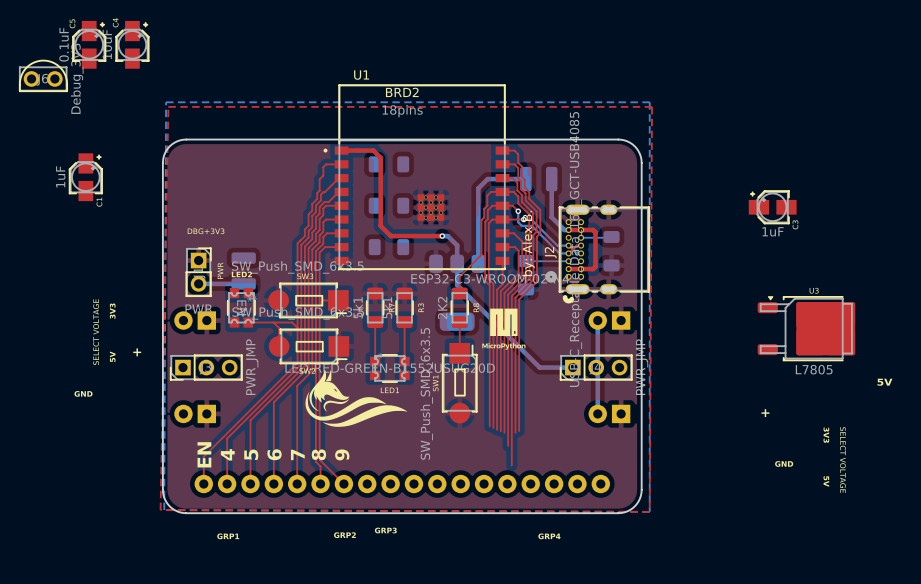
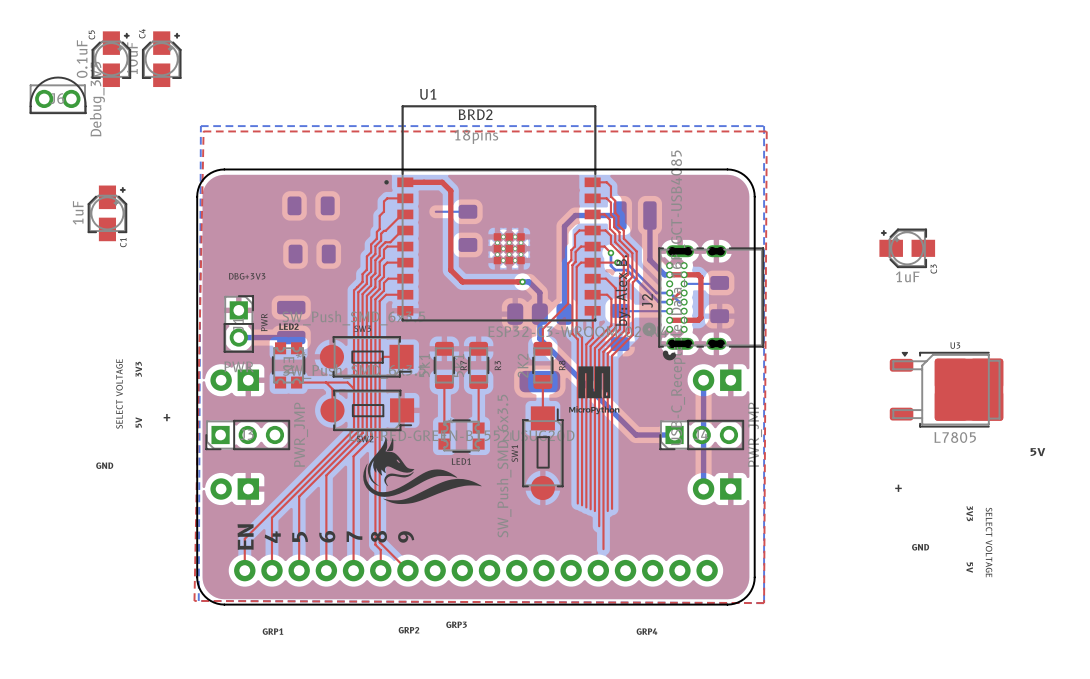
part: (388, 164) -> none
part: none -> (311, 205)
bottom track: none -> (435, 211) (467, 211)
part: none -> (467, 228)
part: (388, 205) -> none
part: none -> (312, 254)
part: (388, 247) -> none

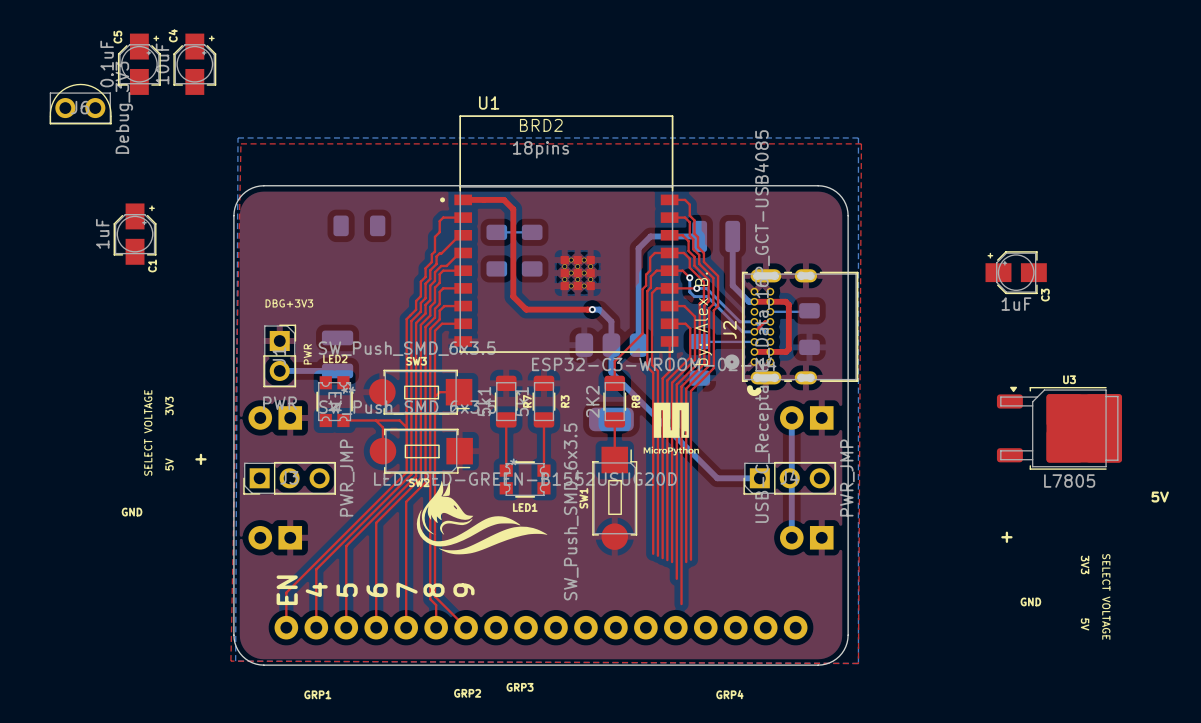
part rotation: 0° (312, 254) -> 90° clockwise (496, 250)
part position: (312, 254) -> (496, 250)

